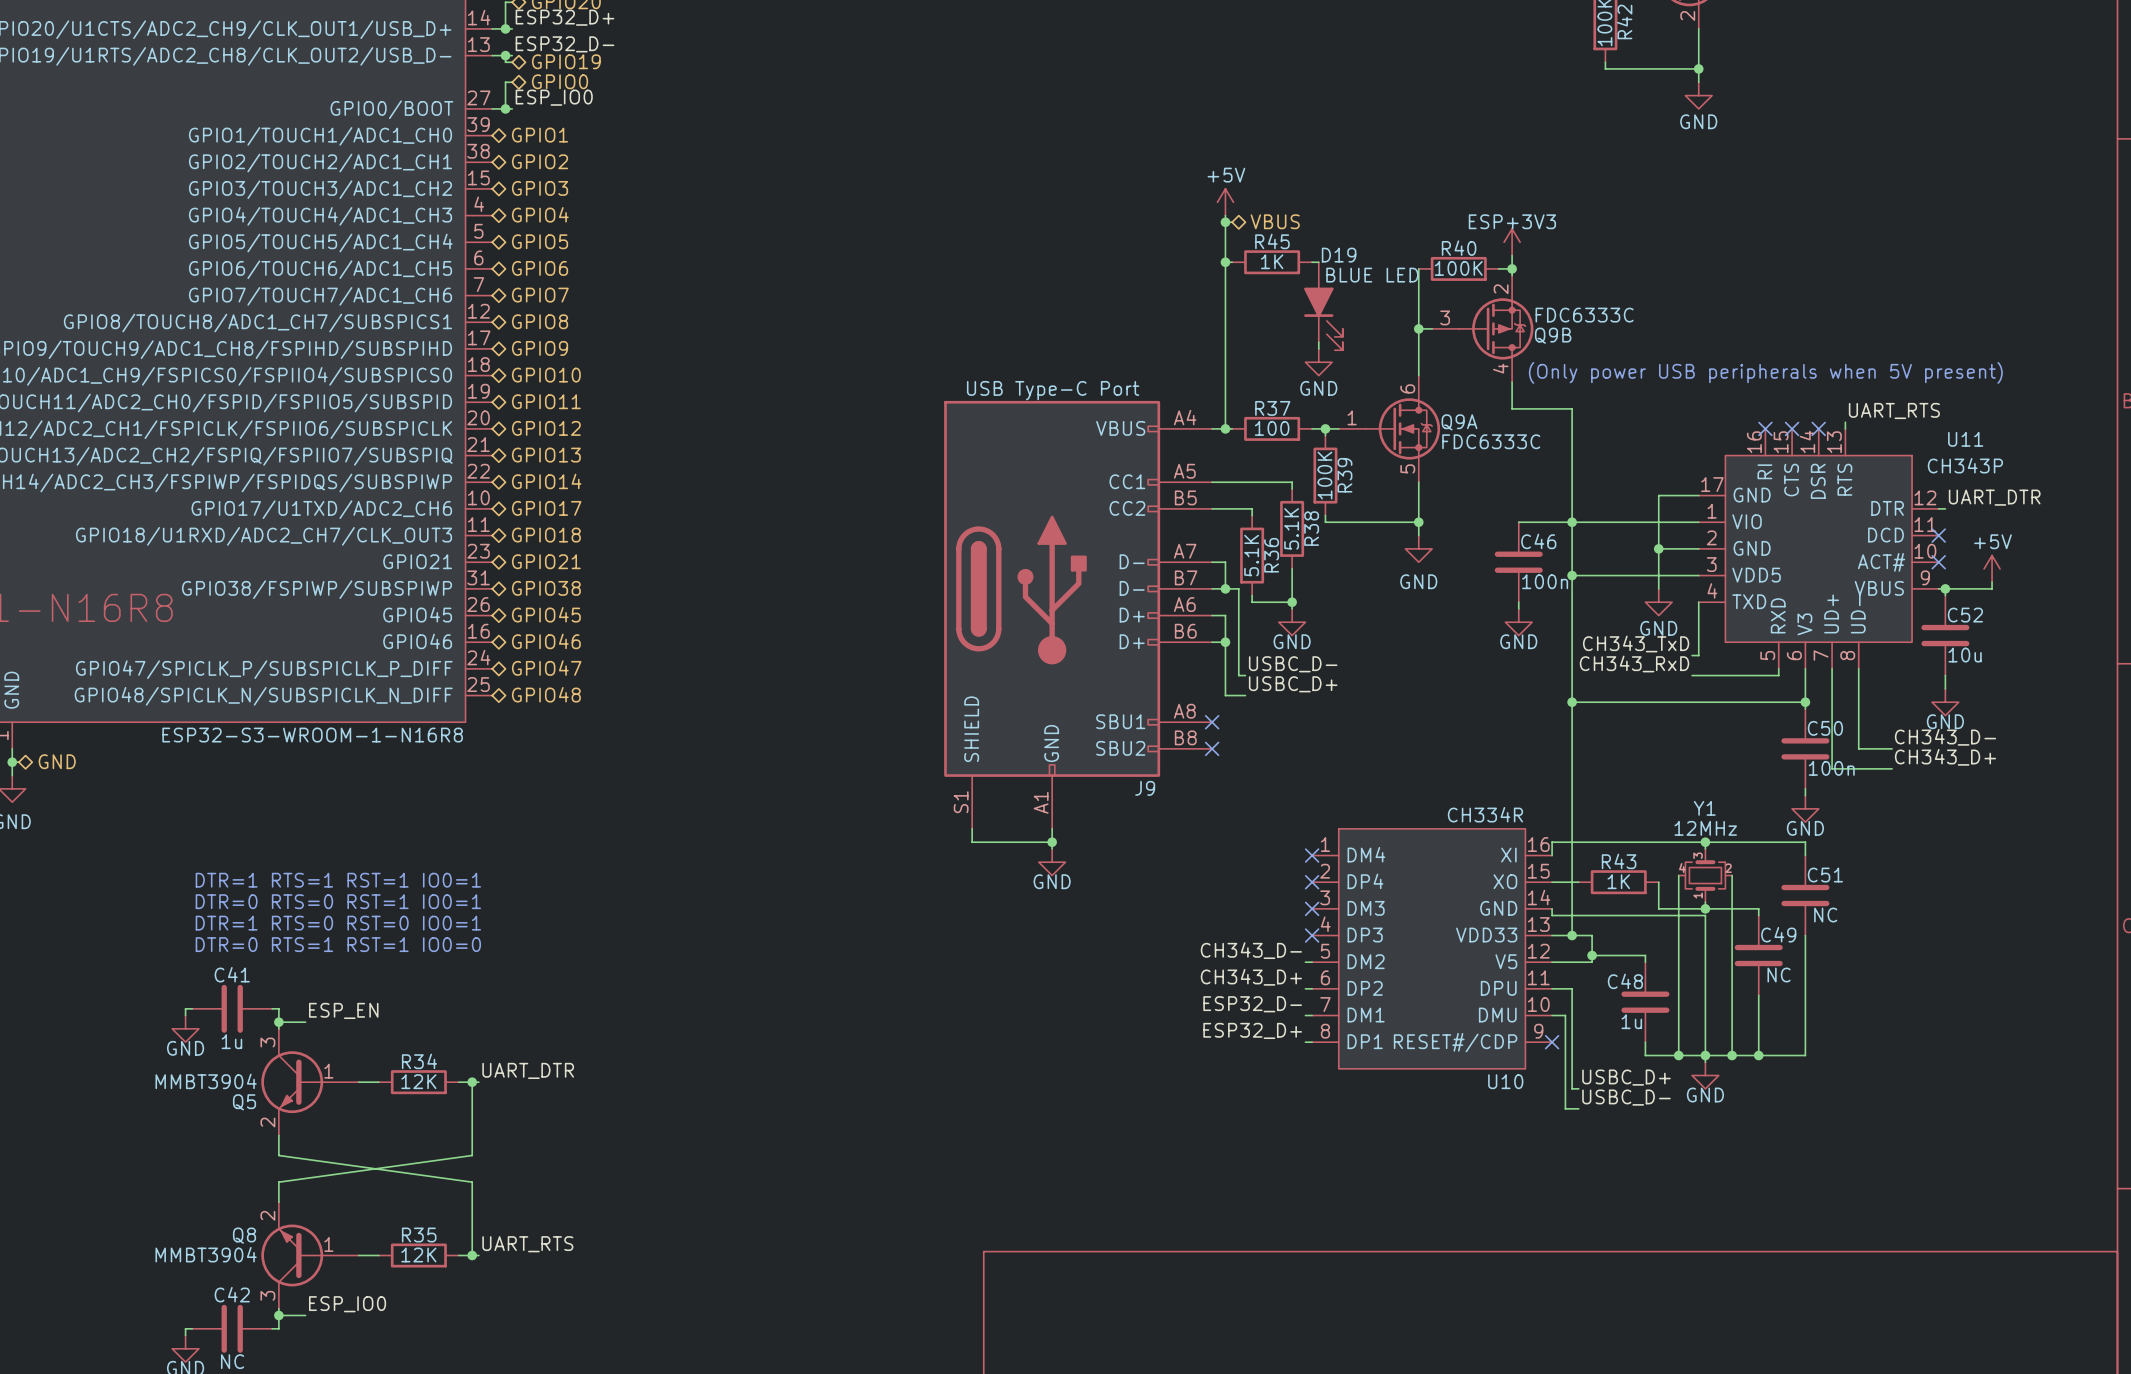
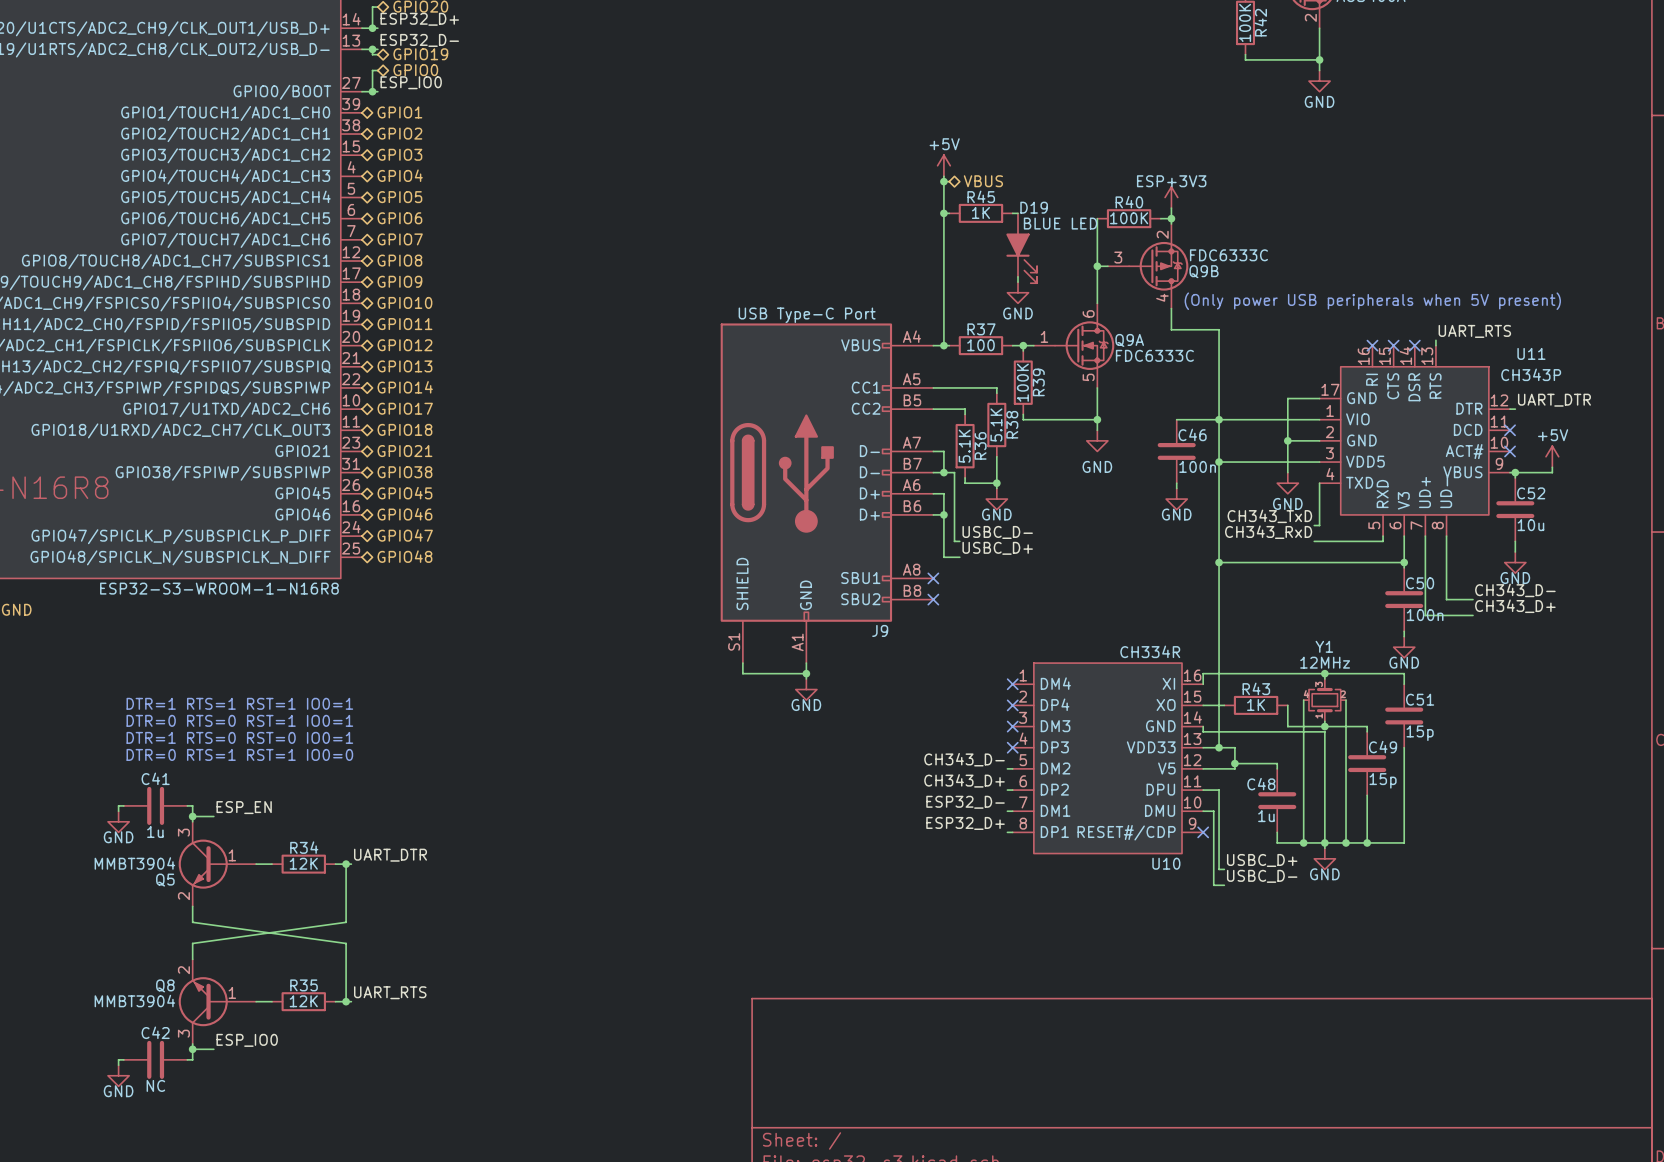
C51 value: NC (1825, 915) -> 15p (1420, 733)
C49 value: NC (1779, 975) -> 15p (1383, 780)

